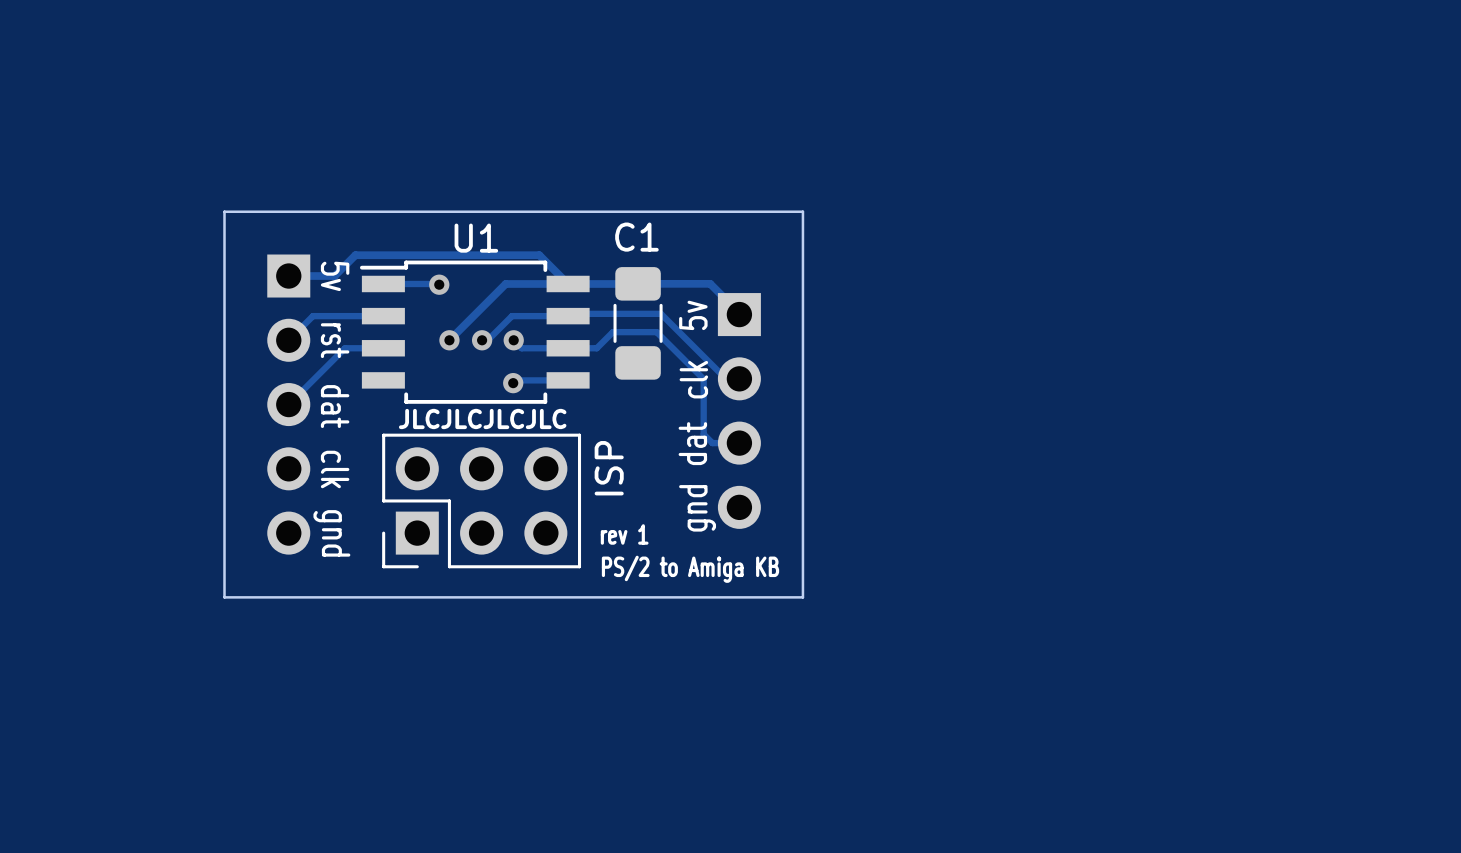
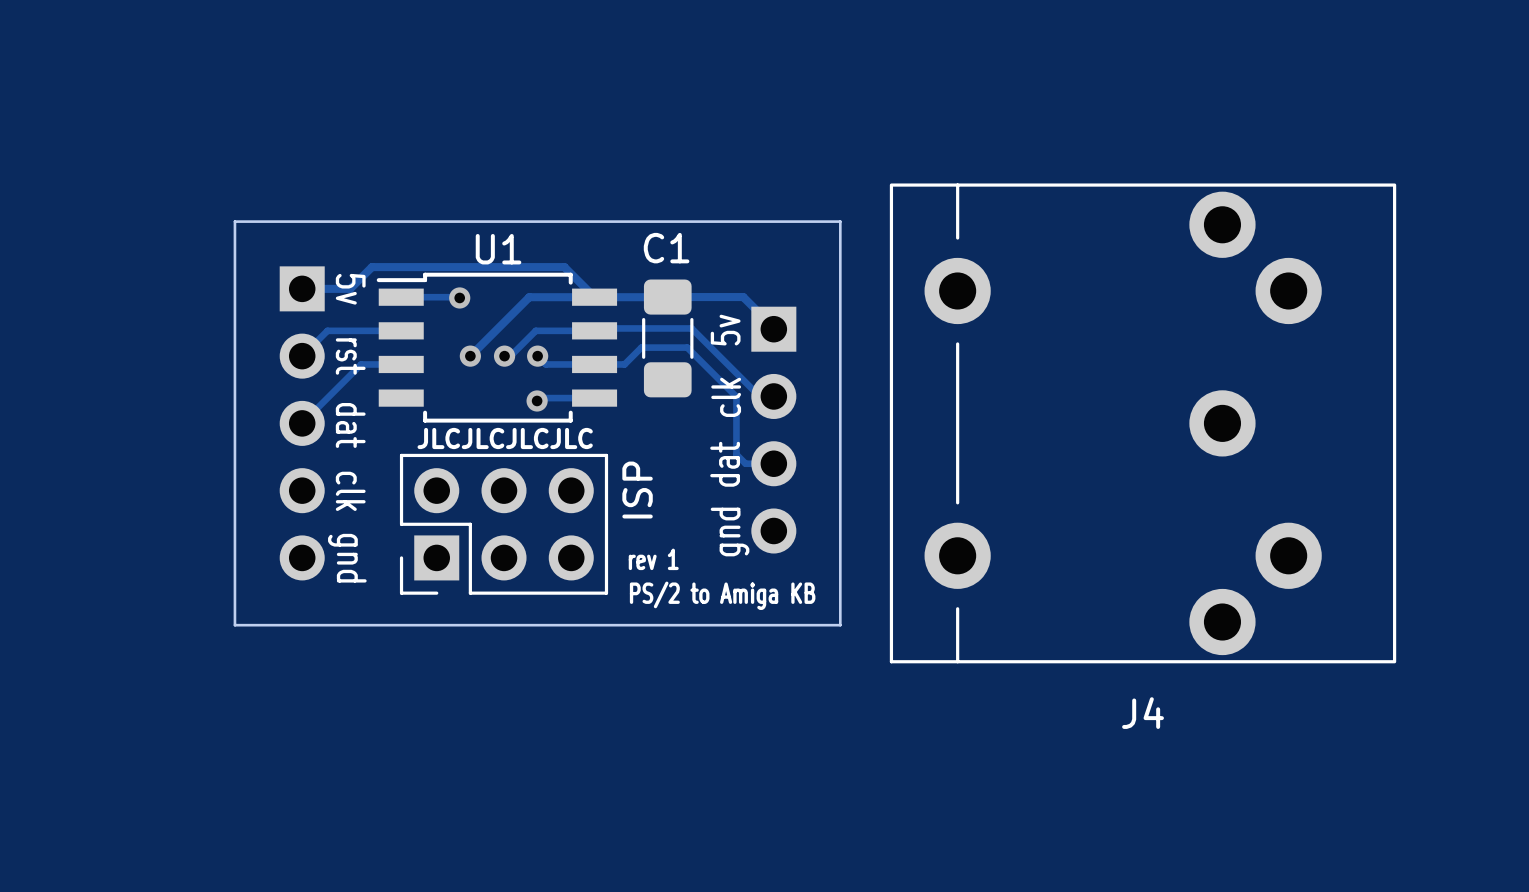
J4: none -> (1143, 423)

